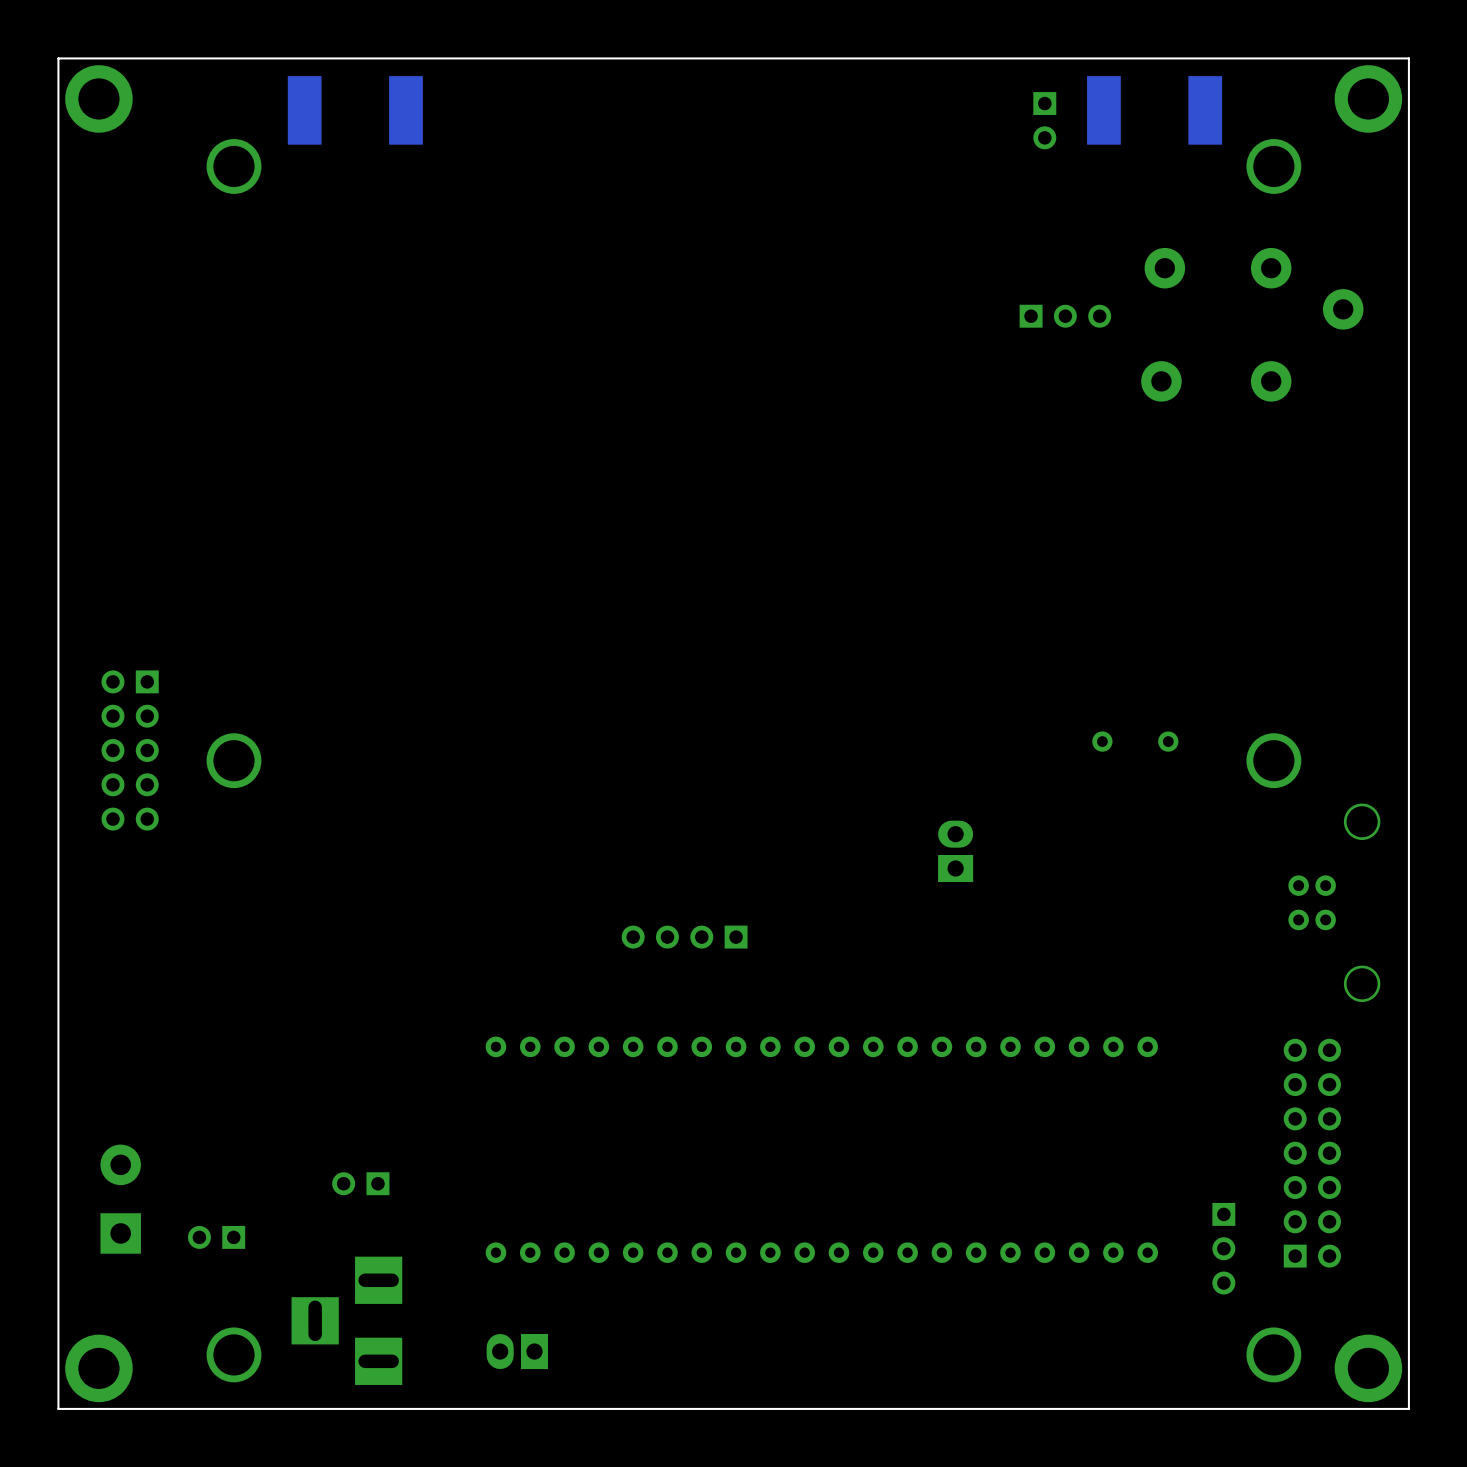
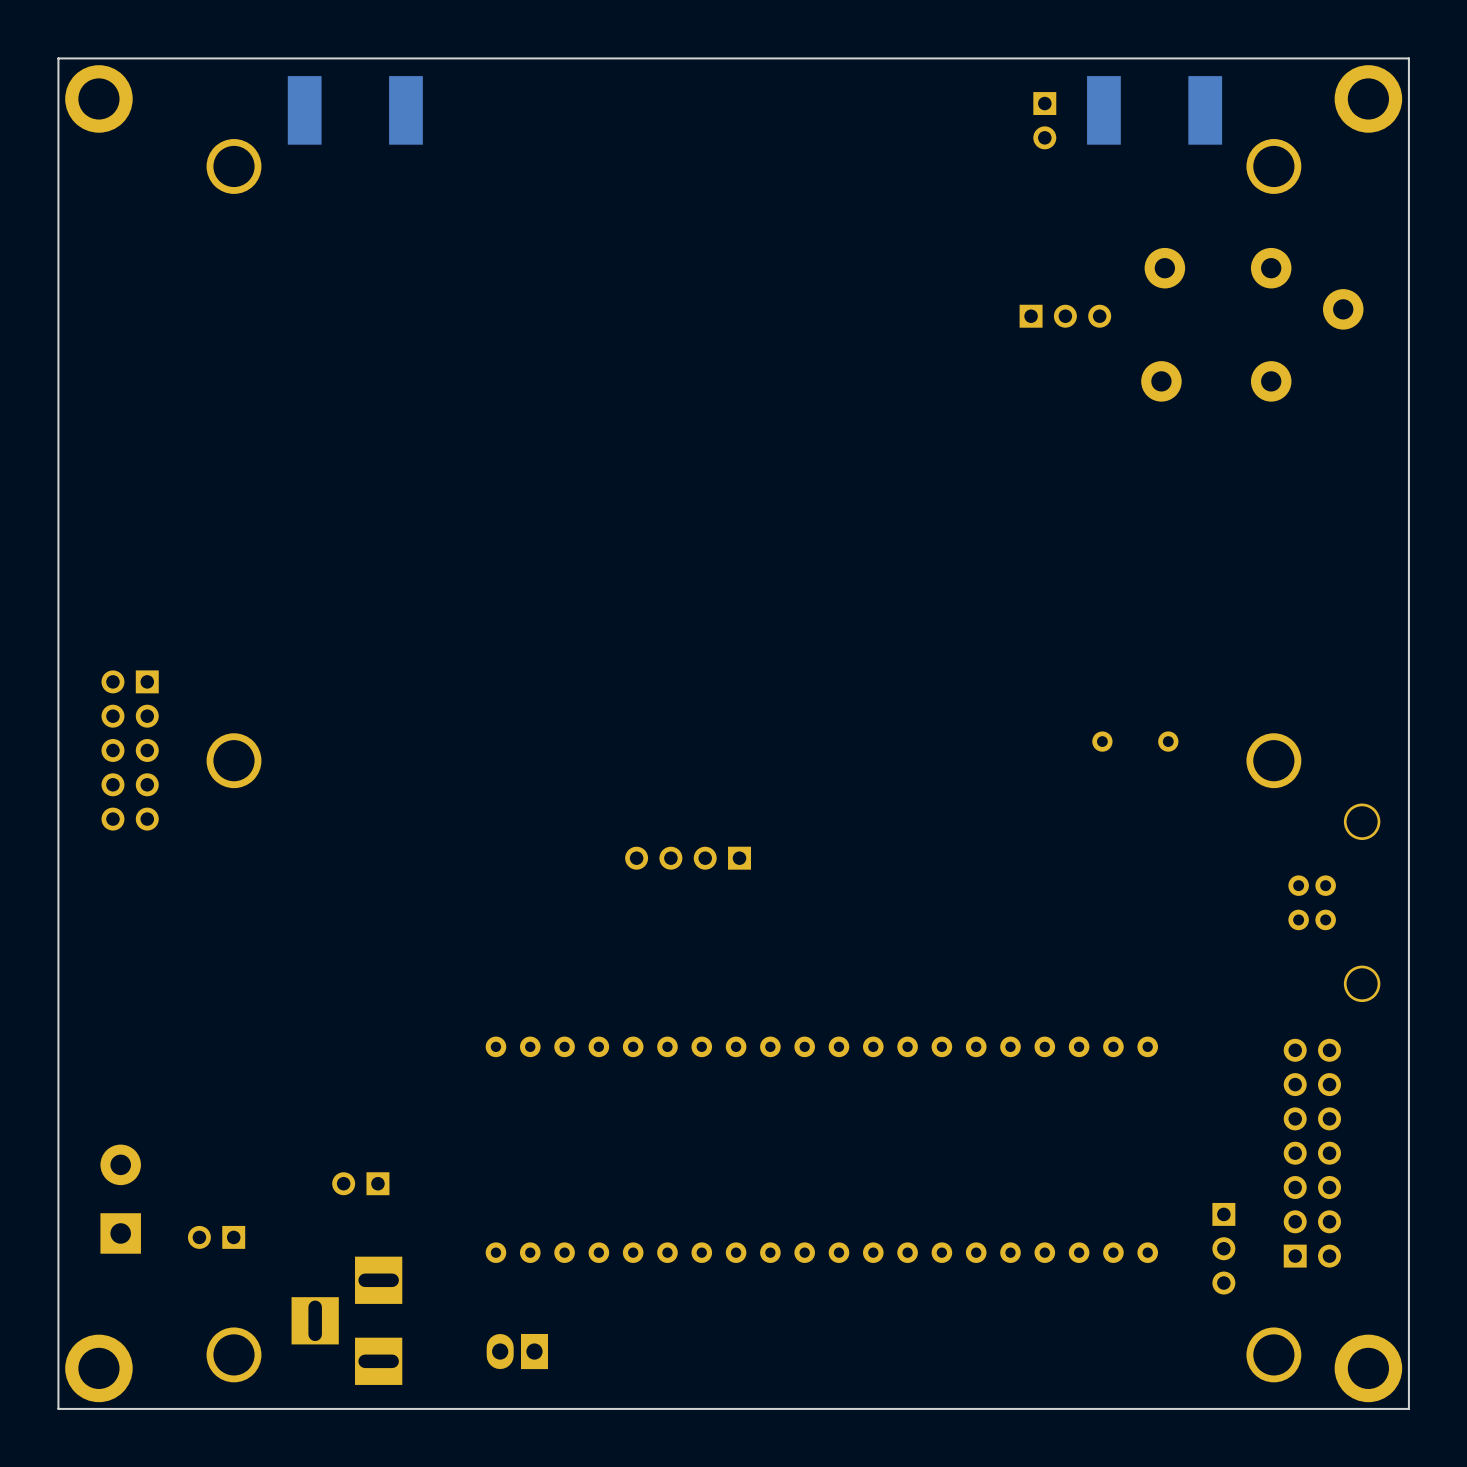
part: (955, 851) -> none
part position: (684, 937) -> (688, 858)

